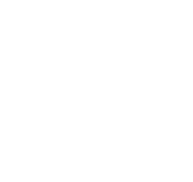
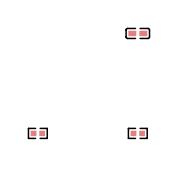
part: none -> (137, 33)
part: none -> (37, 133)
part: none -> (137, 133)

